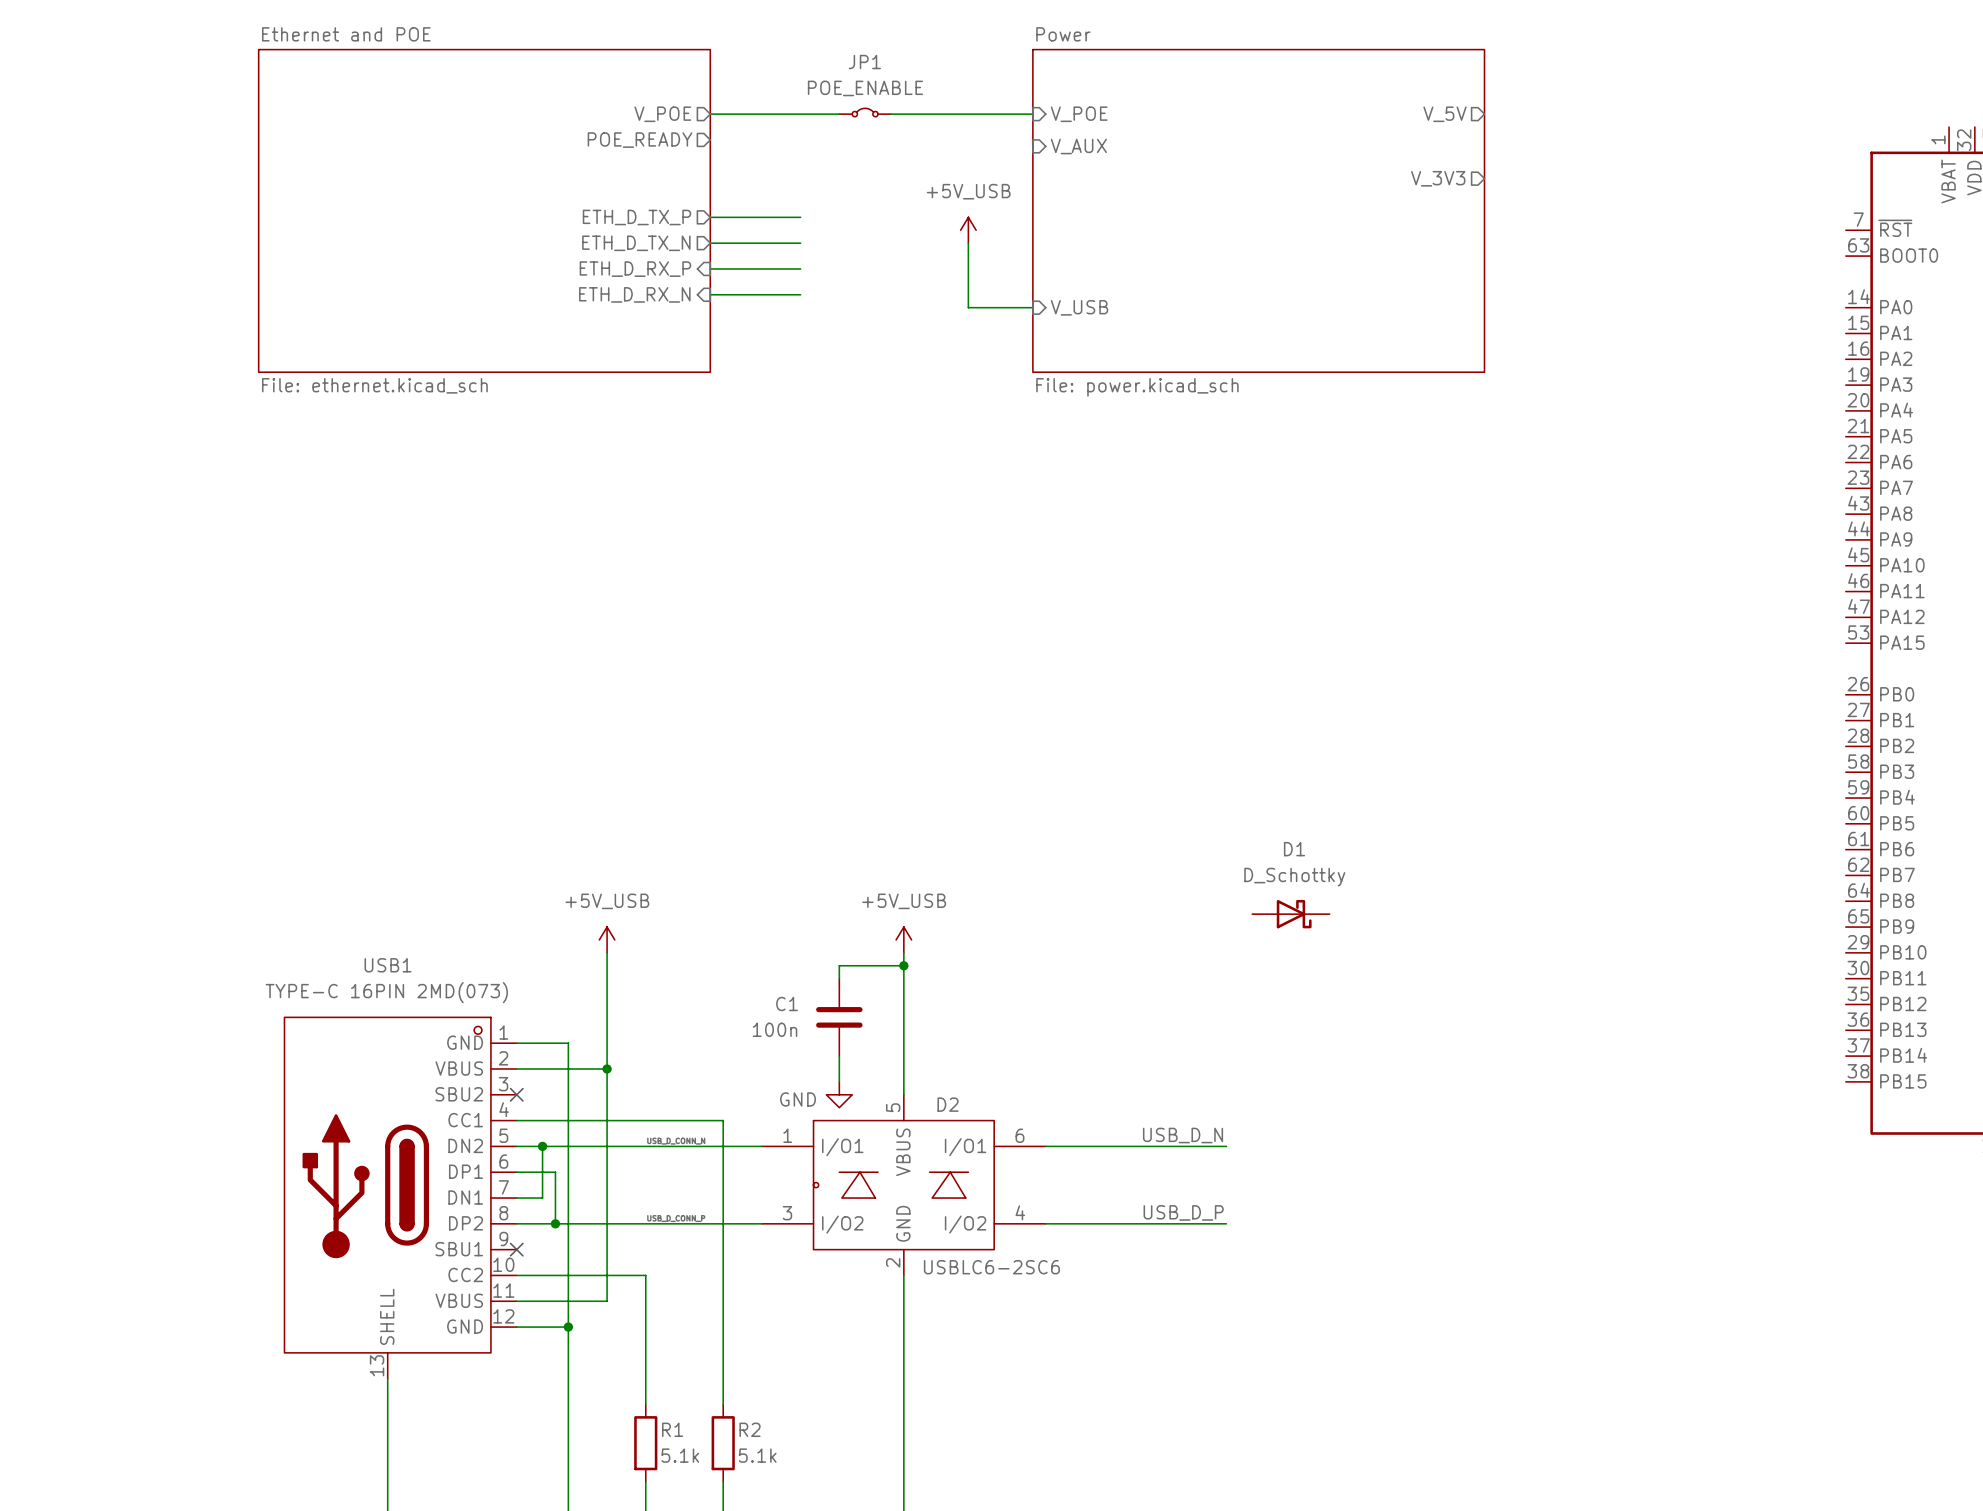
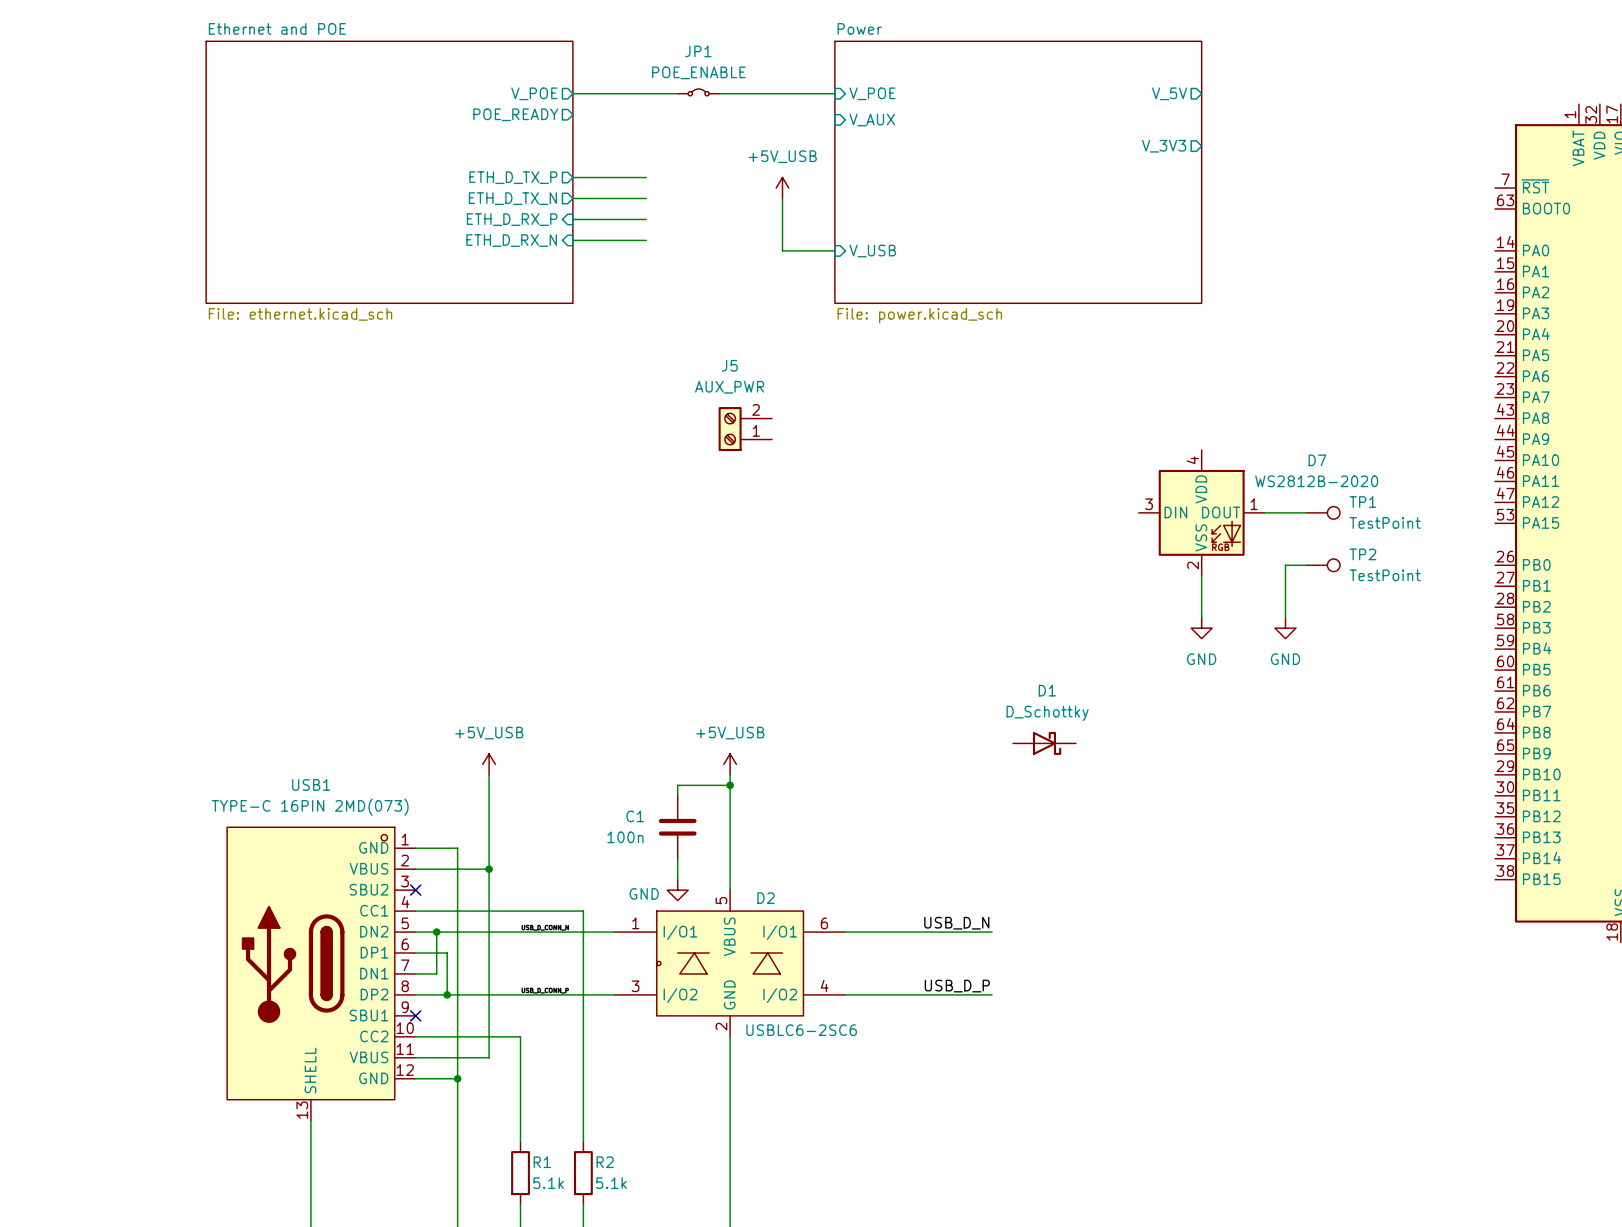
J5: none -> AUX_PWR (745, 429)
D7: none -> WS2812B-2020 (1201, 512)
wire: none -> (1264, 512) (1306, 512)
TP1: none -> TestPoint (1323, 512)
wire: none -> (1306, 565) (1285, 565) (1285, 617)
TP2: none -> TestPoint (1323, 565)
wire: none -> (1201, 575) (1201, 617)
power symbol: none -> GND (1201, 628)
power symbol: none -> GND (1285, 628)

